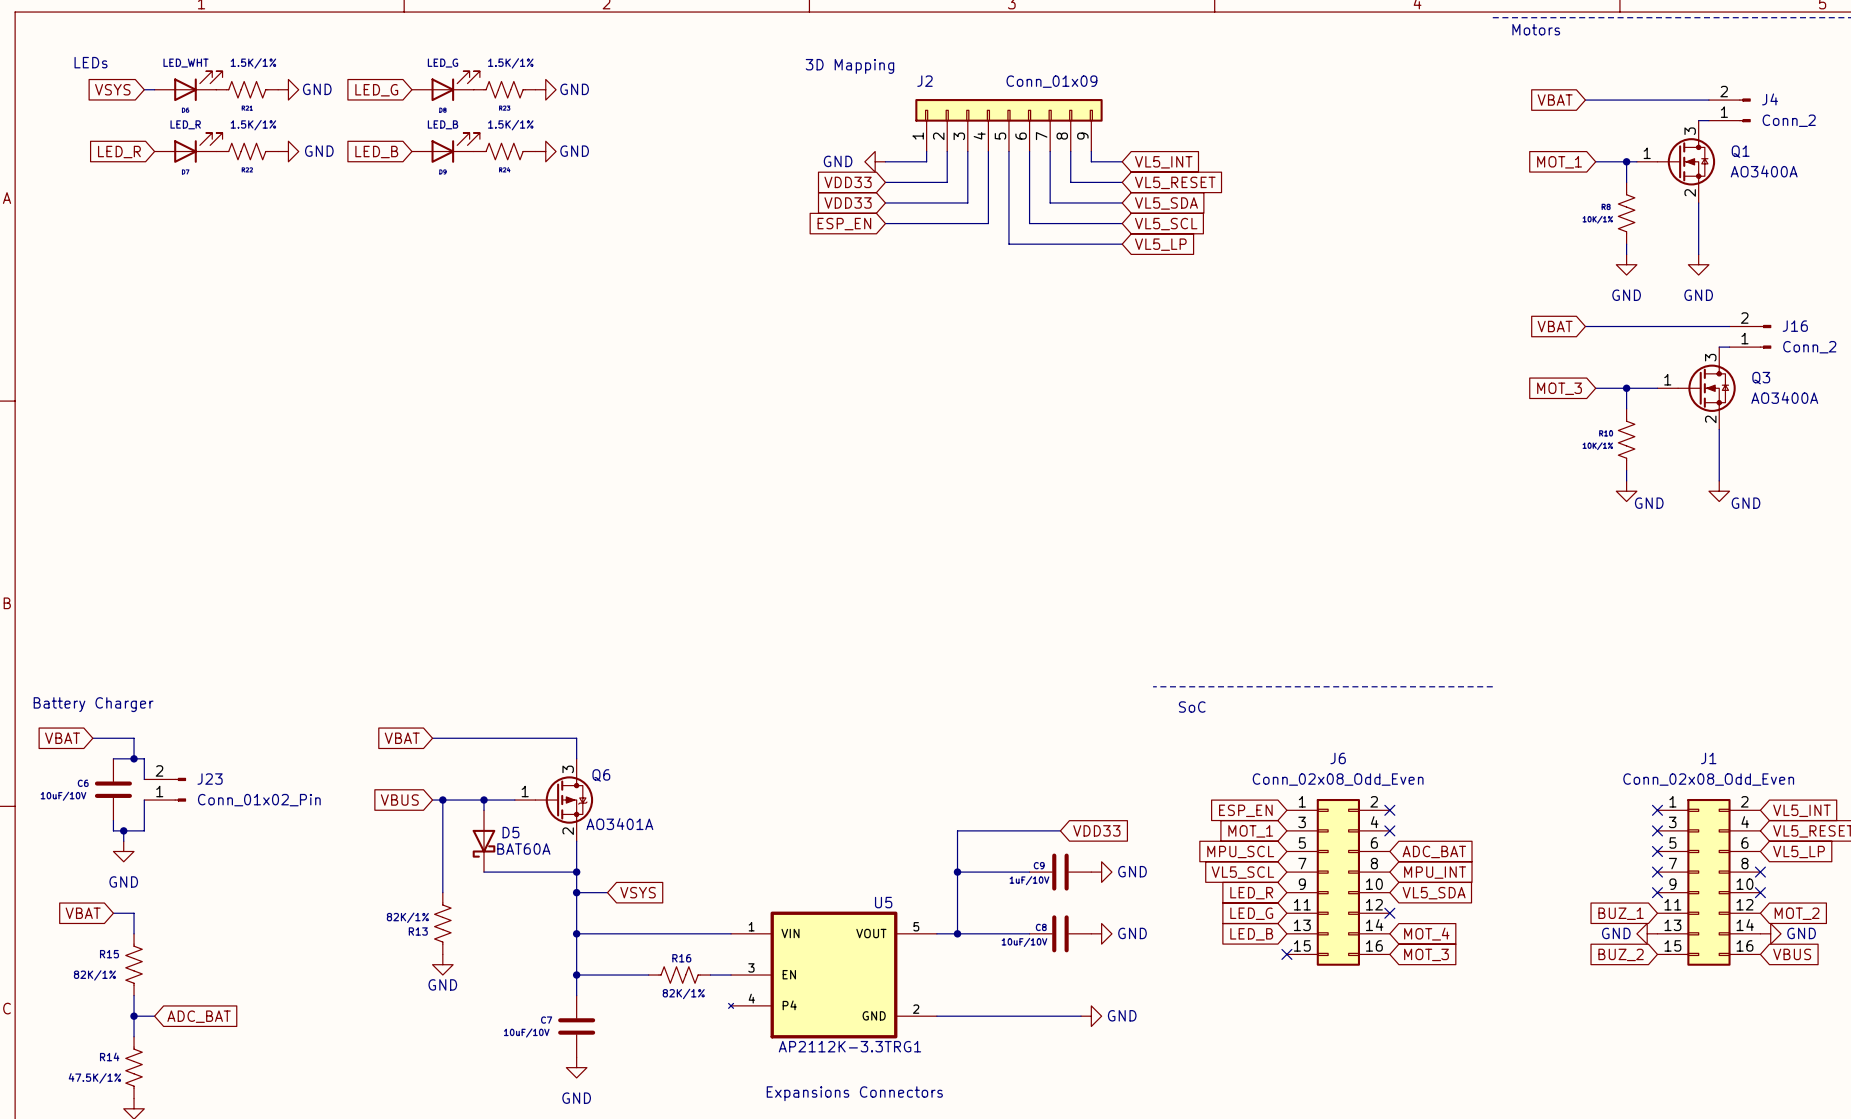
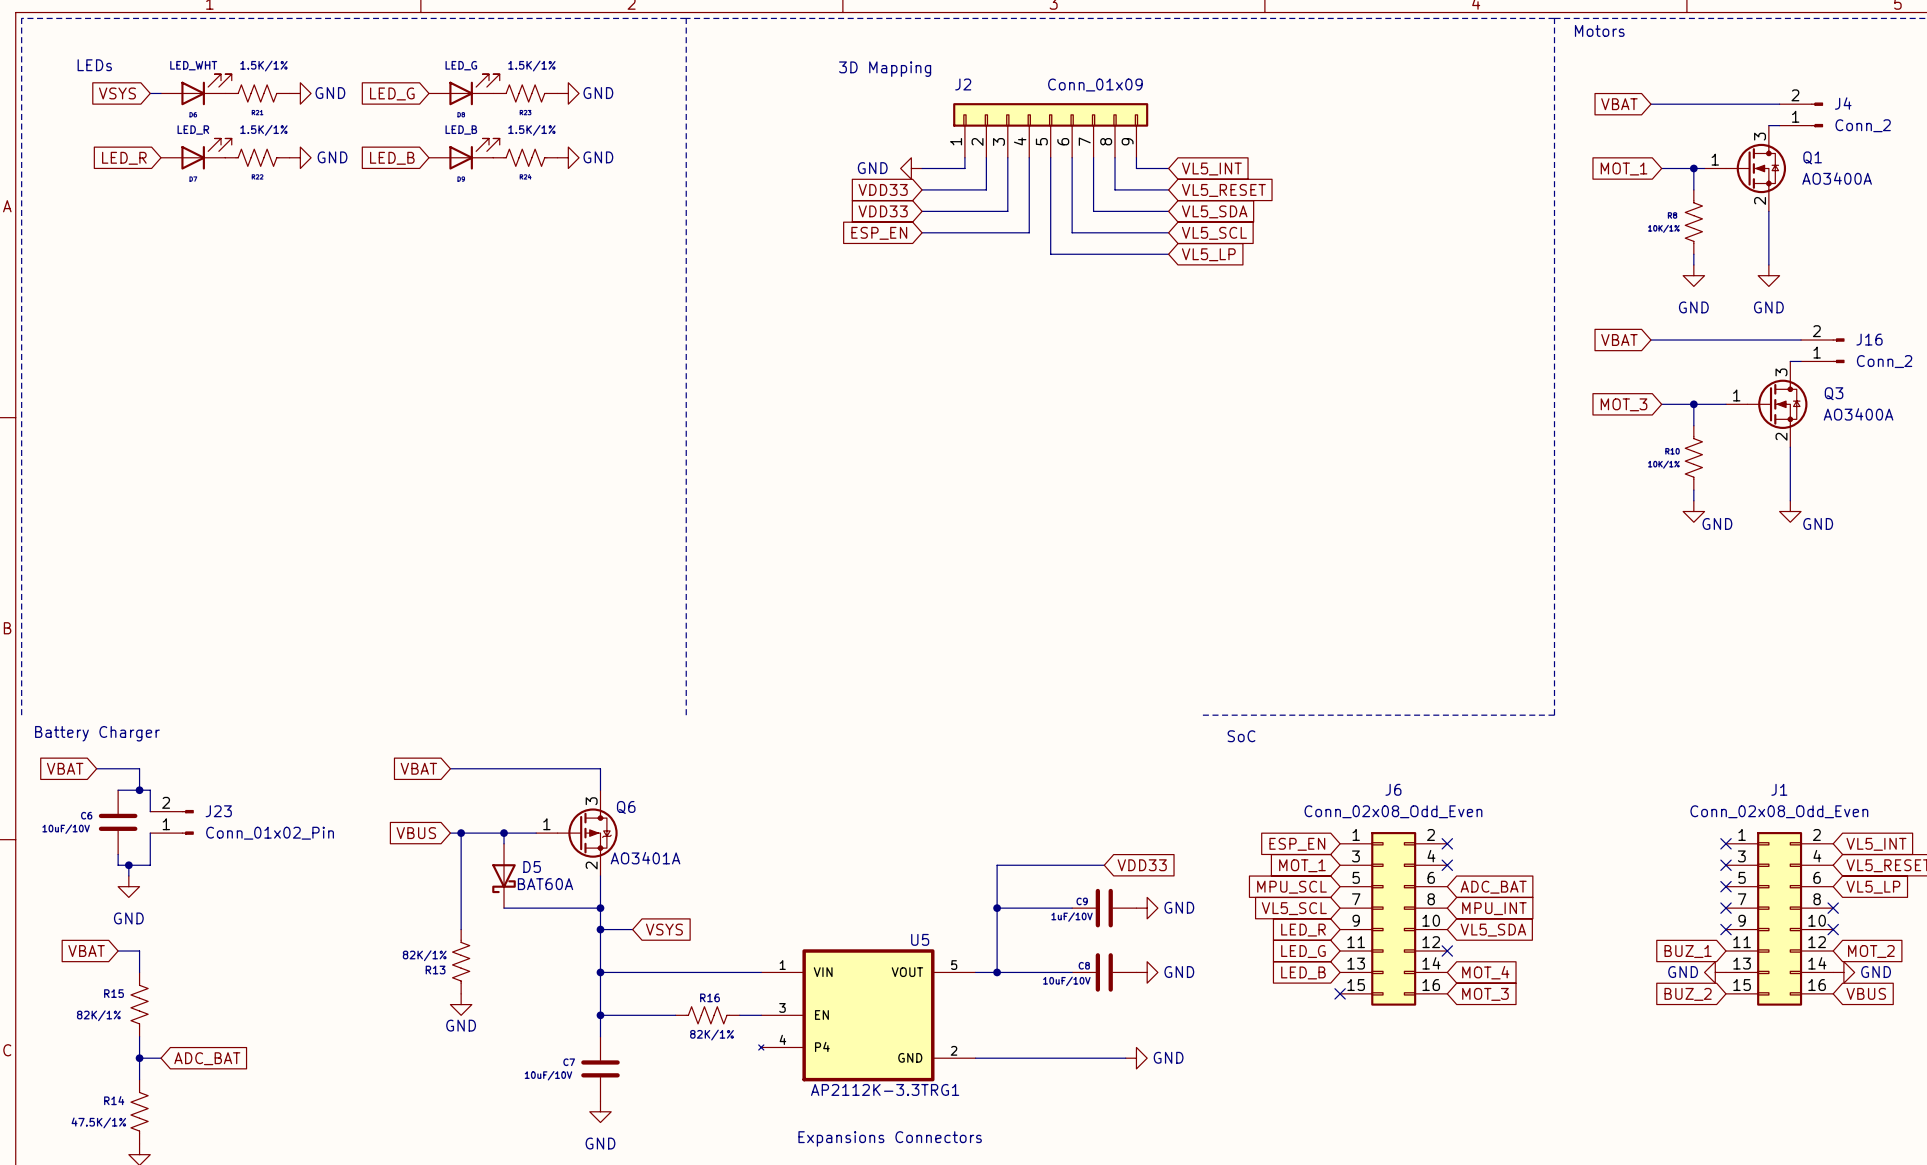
line: none -> (686, 18) (686, 715)
line: none -> (21, 715) (21, 18) (1554, 18) (1554, 715)

